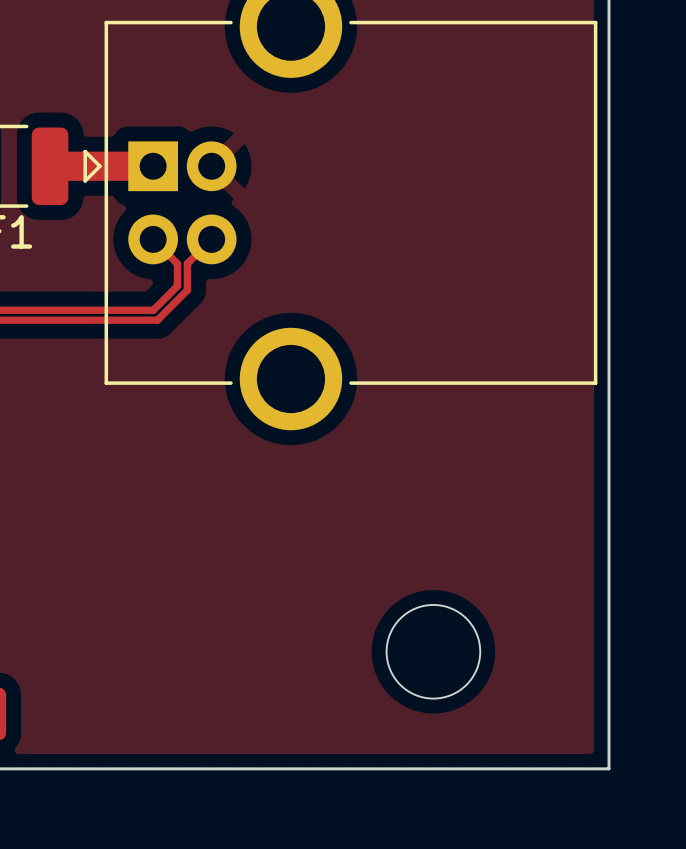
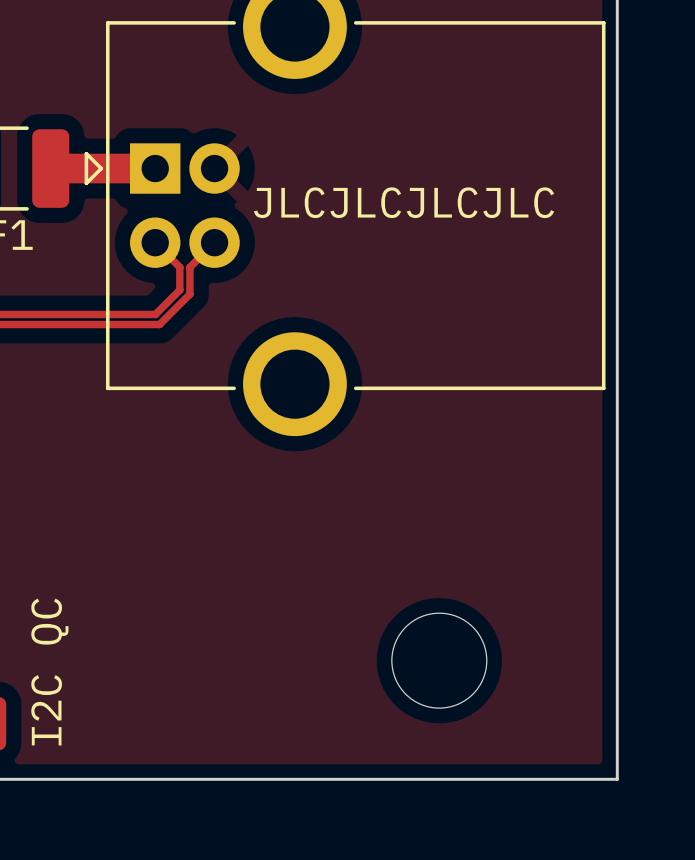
text: none -> JLCJLCJLCJLC (403, 202)
text: none -> I2C QC (49, 672)

